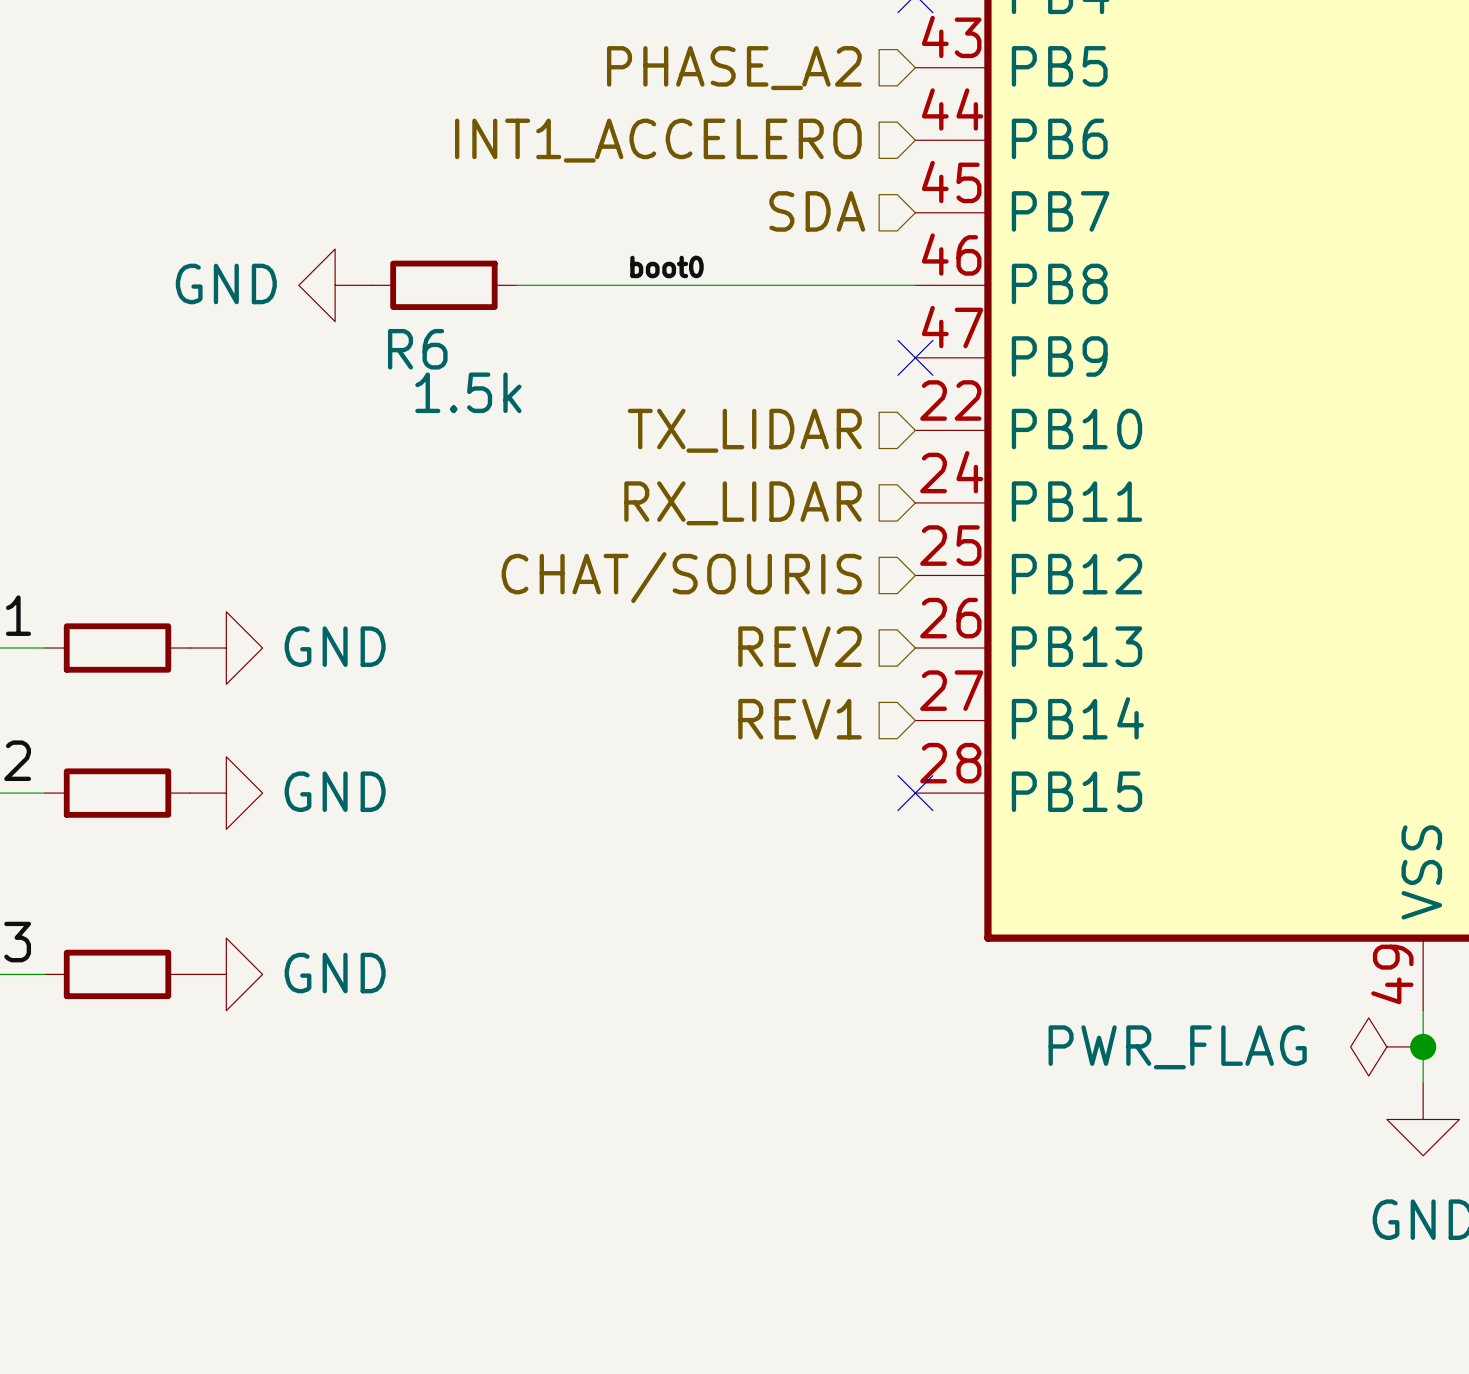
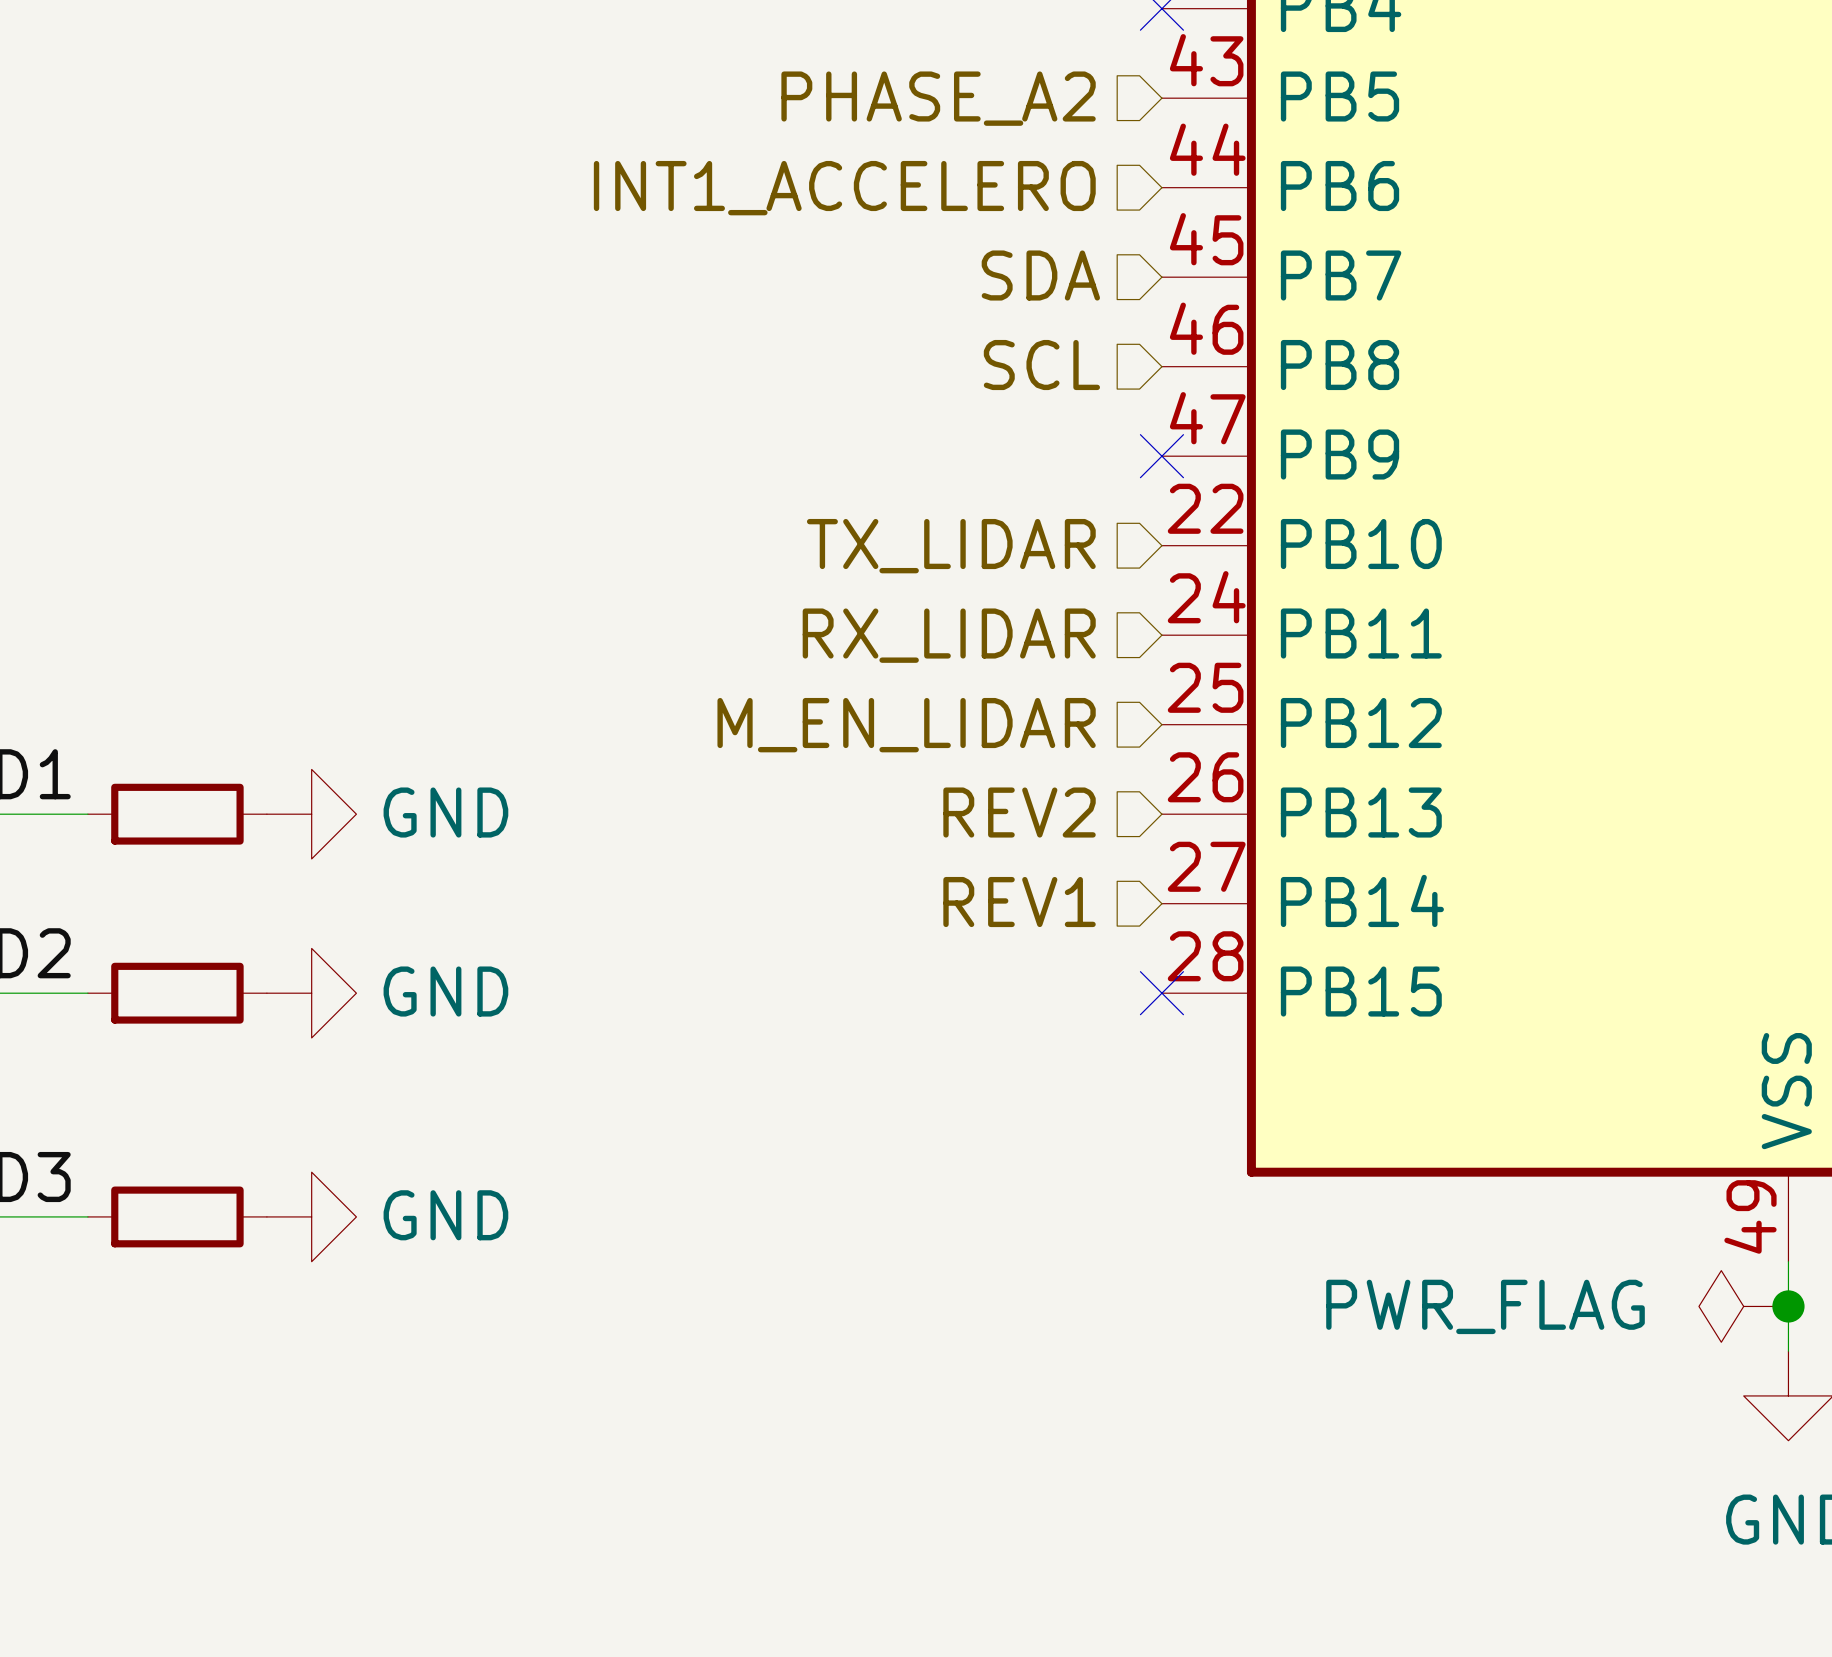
label: boot0 (666, 266) -> none
hierarchical label: none -> SCL (1041, 365)
power symbol: GND (335, 285) -> none
R6: 1.5k (443, 285) -> none
wire: (516, 285) (915, 285) -> none
hierarchical label: CHAT/SOURIS (681, 577) -> M_EN_LIDAR (906, 725)

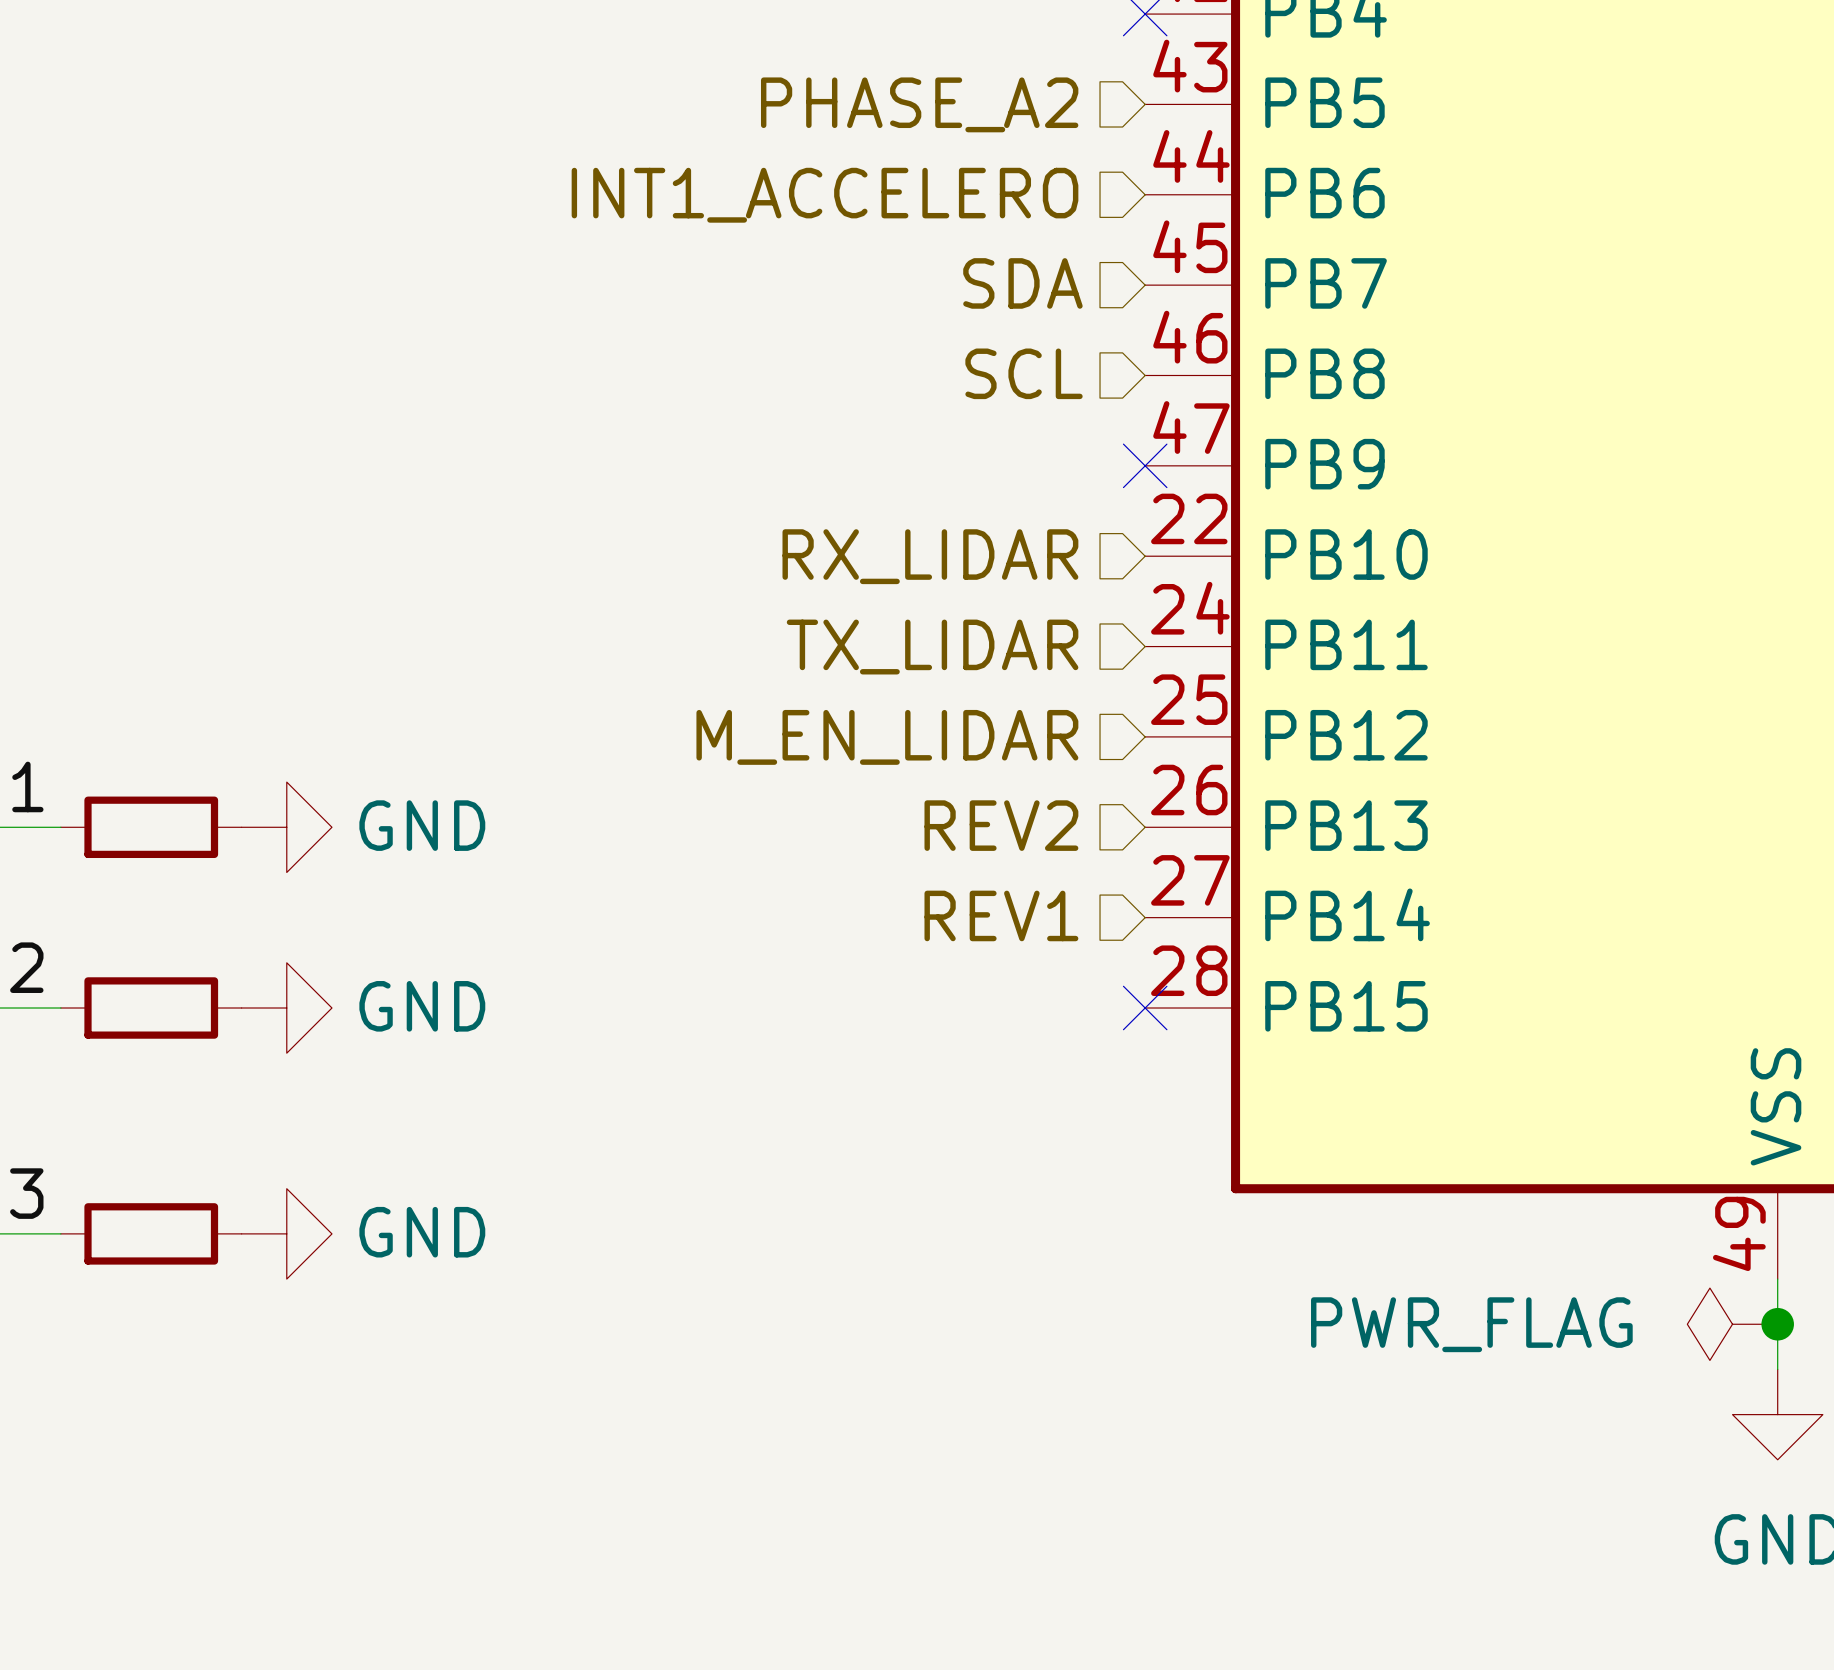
hierarchical label: TX_LIDAR (951, 546) -> RX_LIDAR (930, 556)
hierarchical label: RX_LIDAR (949, 635) -> TX_LIDAR (932, 647)

